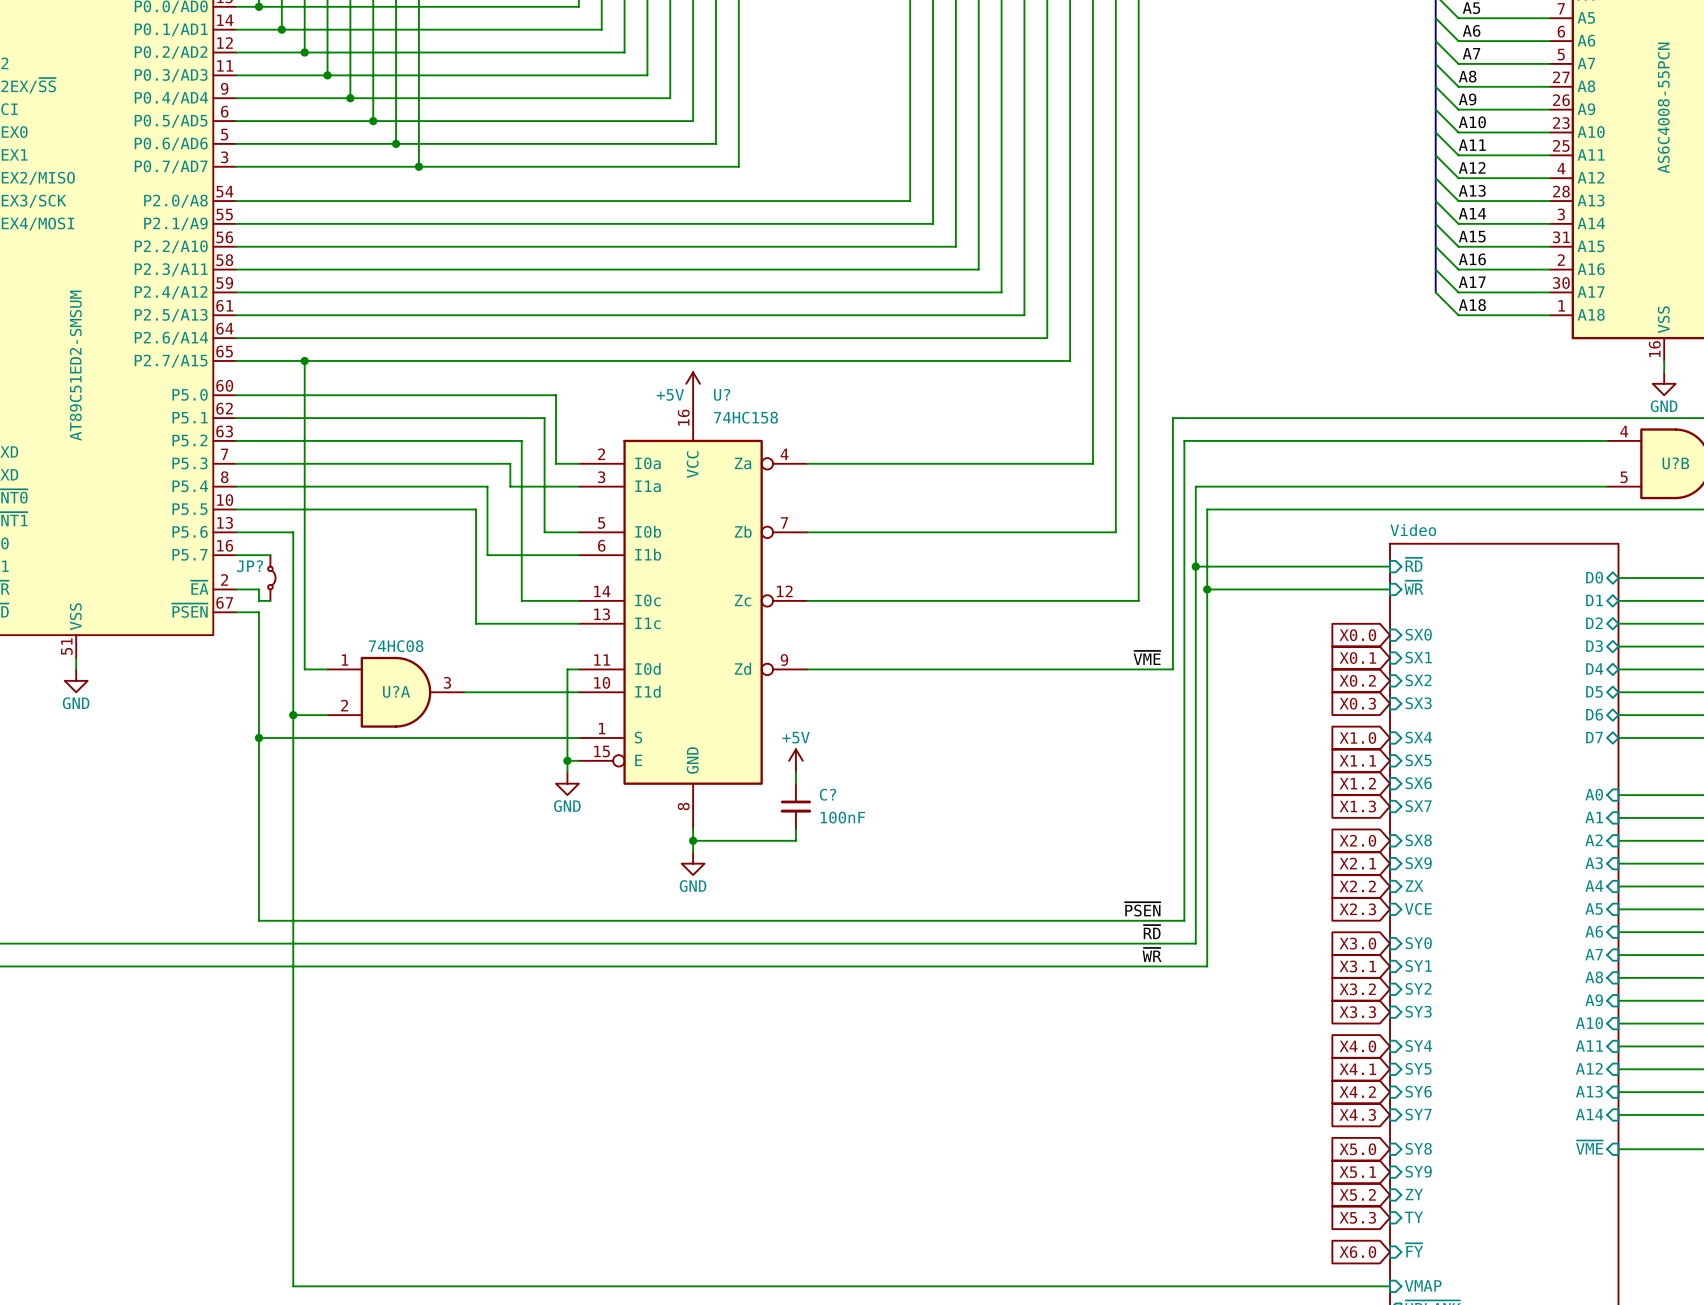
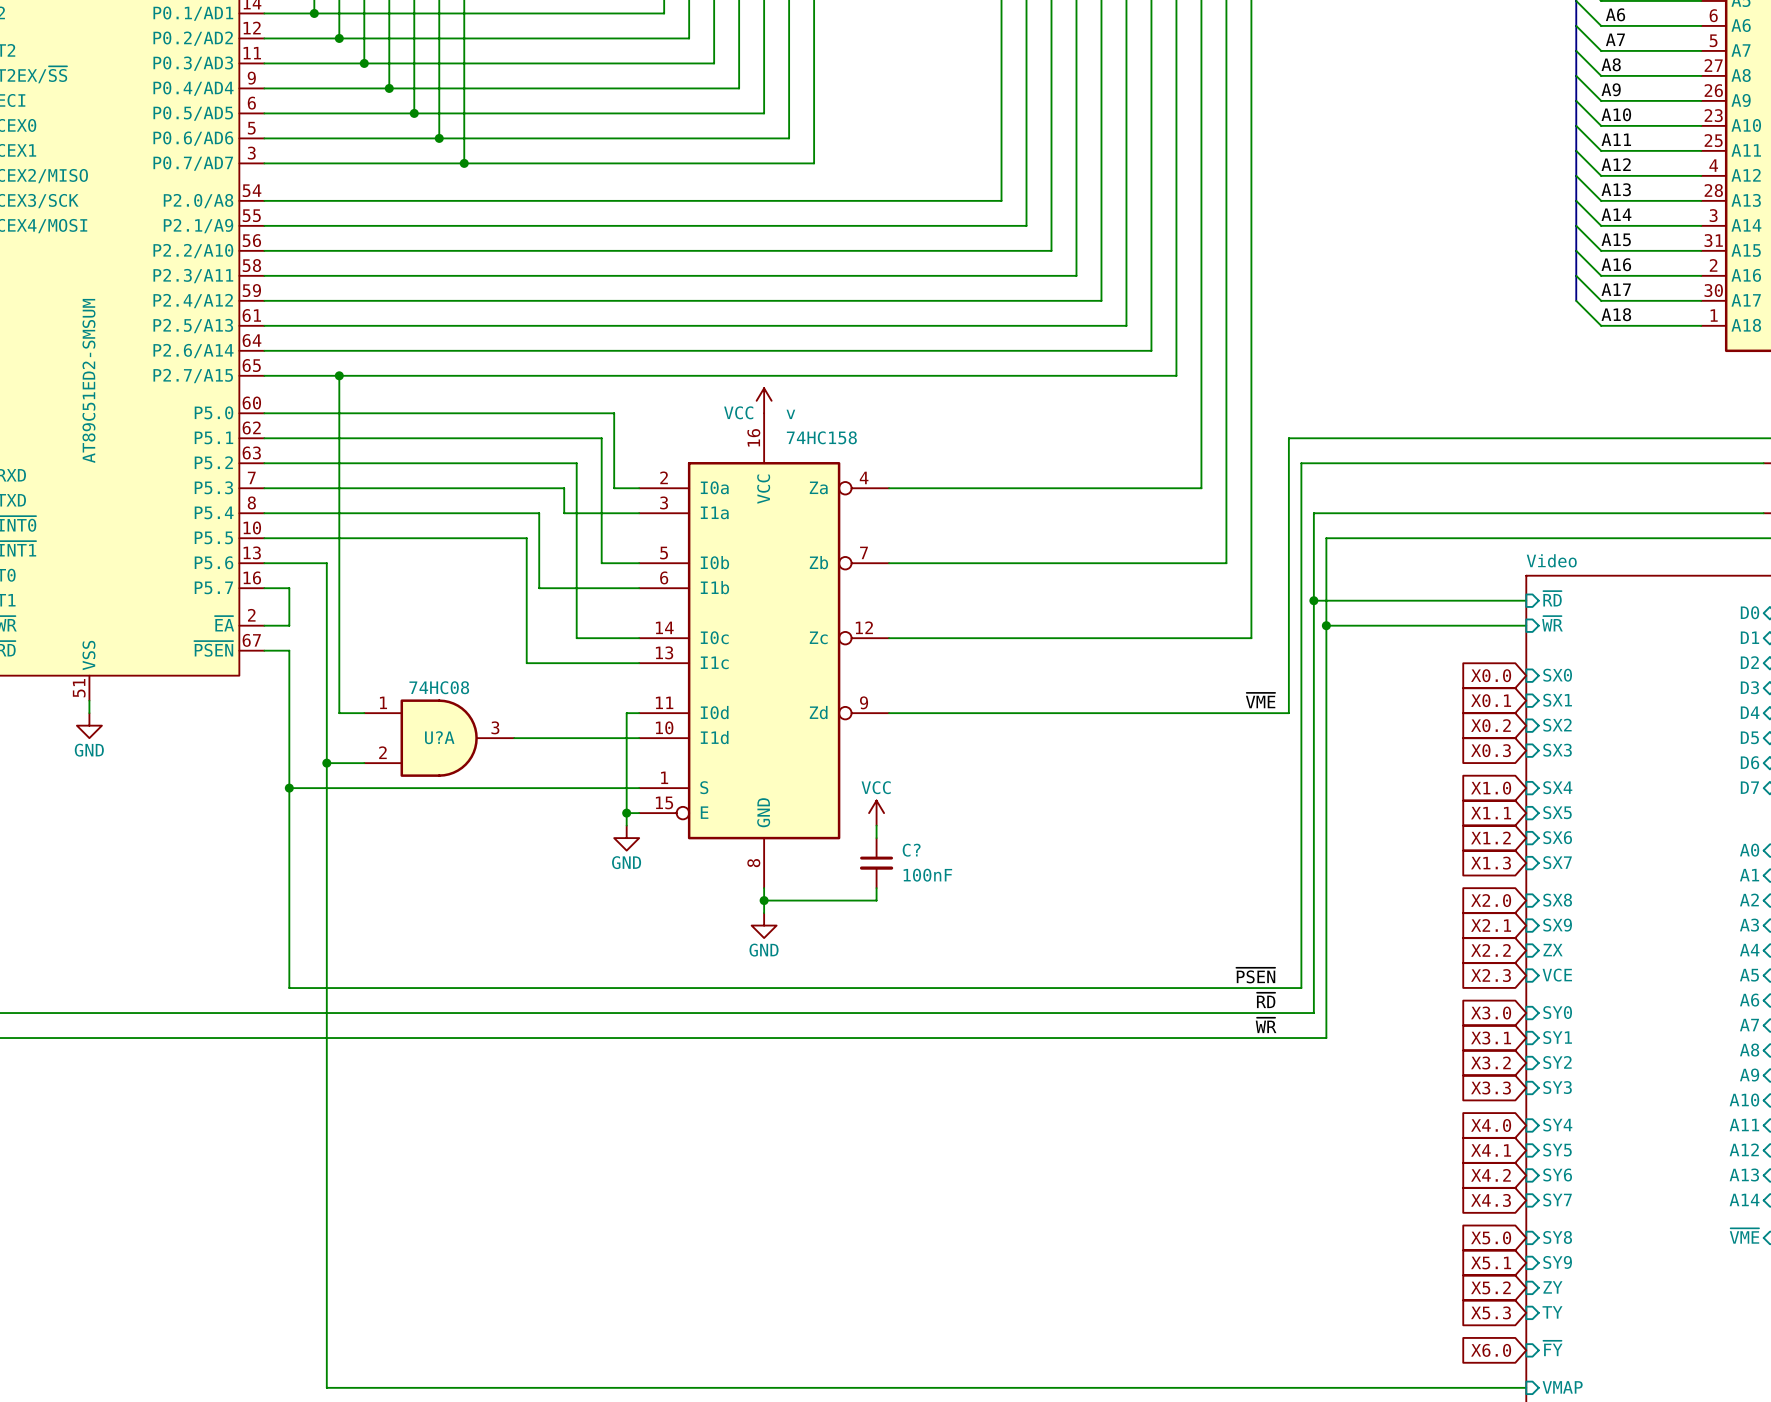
power symbol: +5V (693, 383) -> VCC (764, 400)
U? name: U? (722, 394) -> v (790, 414)
wire: (258, 555) (270, 555) -> (289, 588) (289, 625)
JP?: (271, 578) -> none
wire: (258, 589) (258, 600) (270, 600) -> none
power symbol: +5V (795, 760) -> VCC (876, 813)

